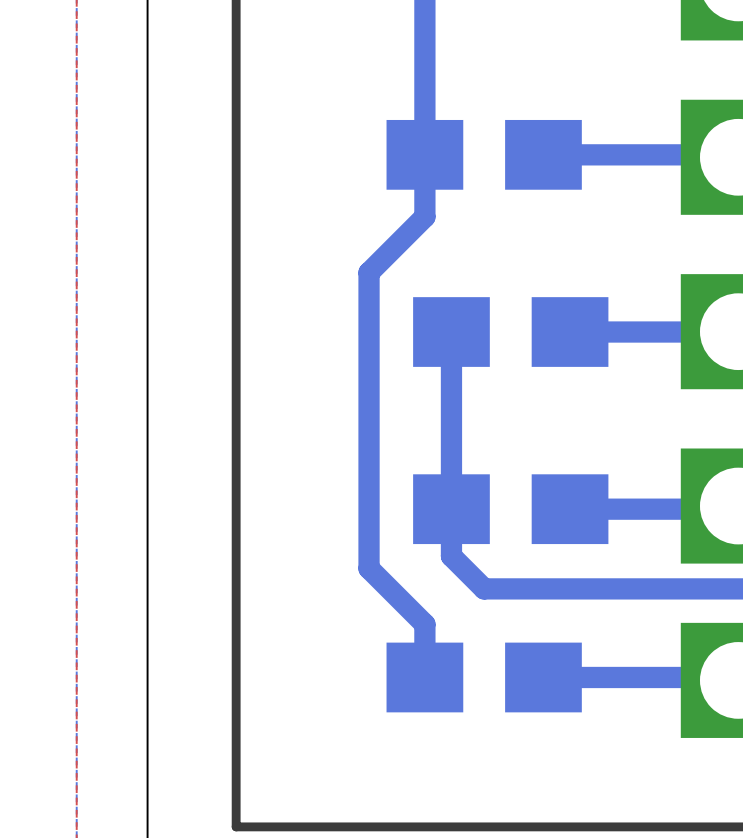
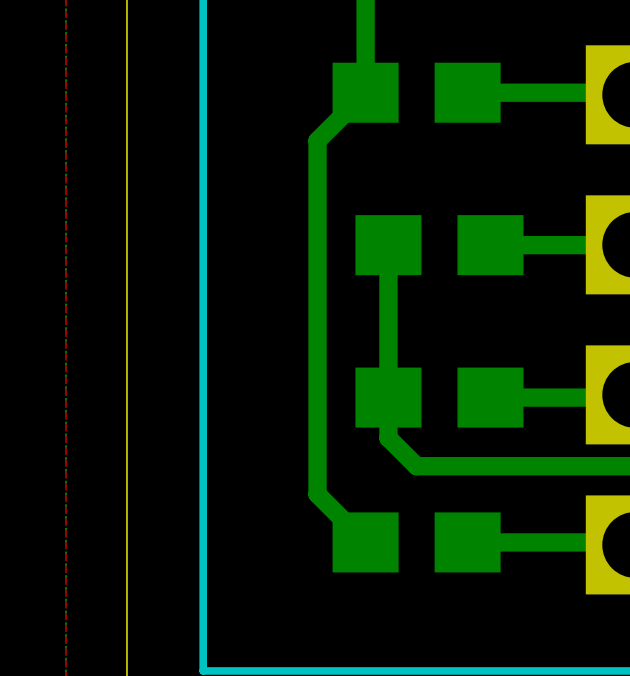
bottom track: (424, 154) (424, 216) (369, 272) -> (365, 92) (317, 140) (317, 194)
bottom track: (369, 568) (424, 624) (424, 677) -> (317, 448) (317, 494) (365, 542)

